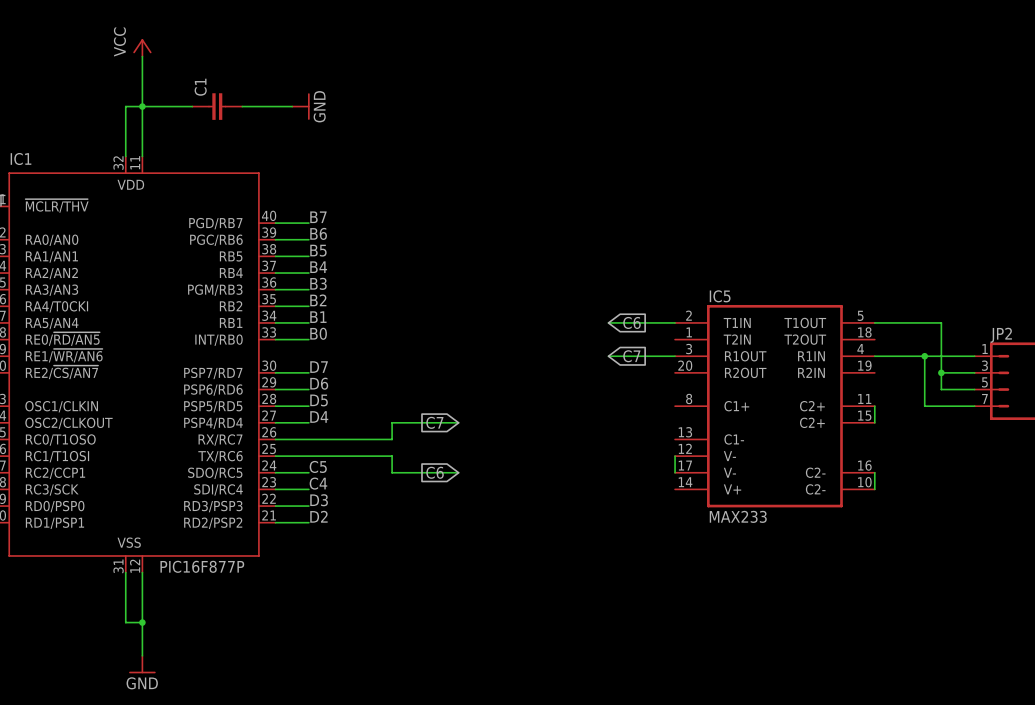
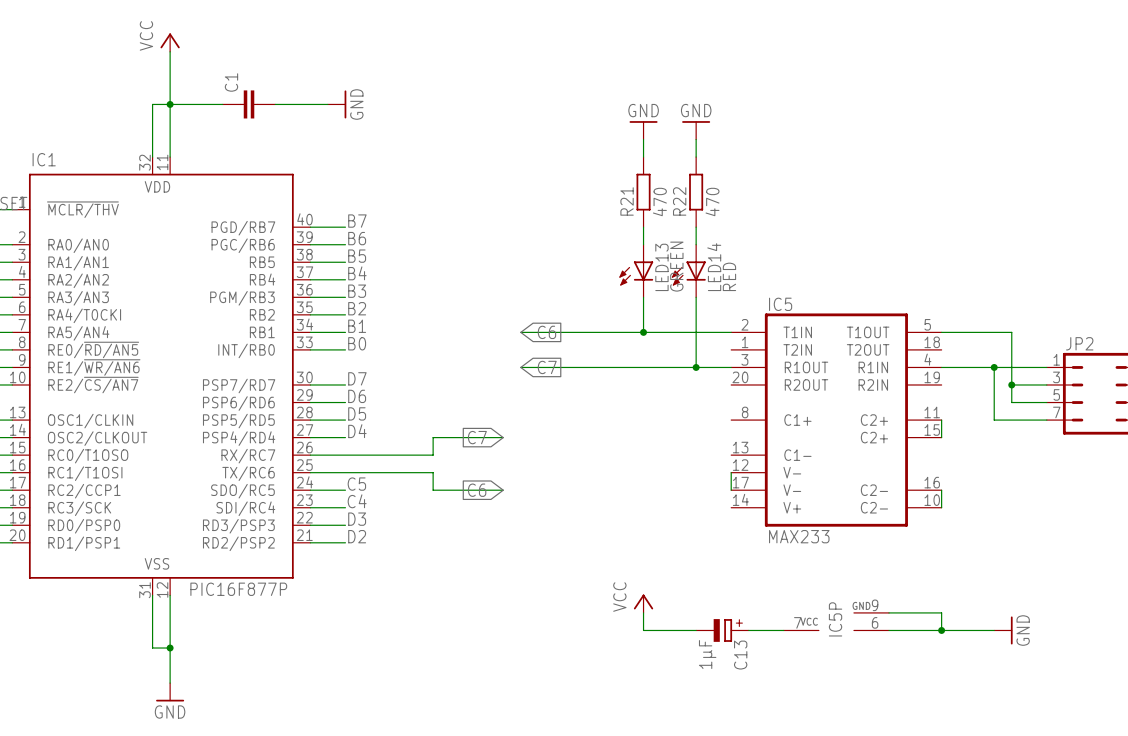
power symbol: none -> GND (643, 130)
power symbol: none -> GND (696, 130)
wire: none -> (643, 139) (643, 157)
wire: none -> (696, 139) (696, 157)
R21: none -> 470 (643, 192)
R22: none -> 470 (696, 192)
wire: none -> (643, 227) (643, 244)
wire: none -> (696, 227) (696, 244)
LED13: none -> GREEN (636, 271)
LED14: none -> RED (688, 271)
wire: none -> (643, 297) (643, 332)
wire: none -> (696, 297) (696, 367)
wire: none -> (520, 332) (661, 332)
junction: none -> (643, 332)
global label position: C6 (632, 322) -> C6 (546, 332)
wire: none -> (520, 367) (661, 367)
global label position: C7 (631, 356) -> C7 (547, 367)
junction: none -> (696, 367)
power symbol: none -> VCC (643, 603)
wire: none -> (643, 612) (643, 630) (696, 630)
wire: none -> (889, 612) (941, 612) (941, 630)
IC5P: none -> (836, 621)
C13: none -> 1μF (722, 630)
wire: none -> (748, 630) (783, 630)
wire: none -> (889, 630) (994, 630)
junction: none -> (941, 630)
power symbol: none -> GND (1003, 630)

